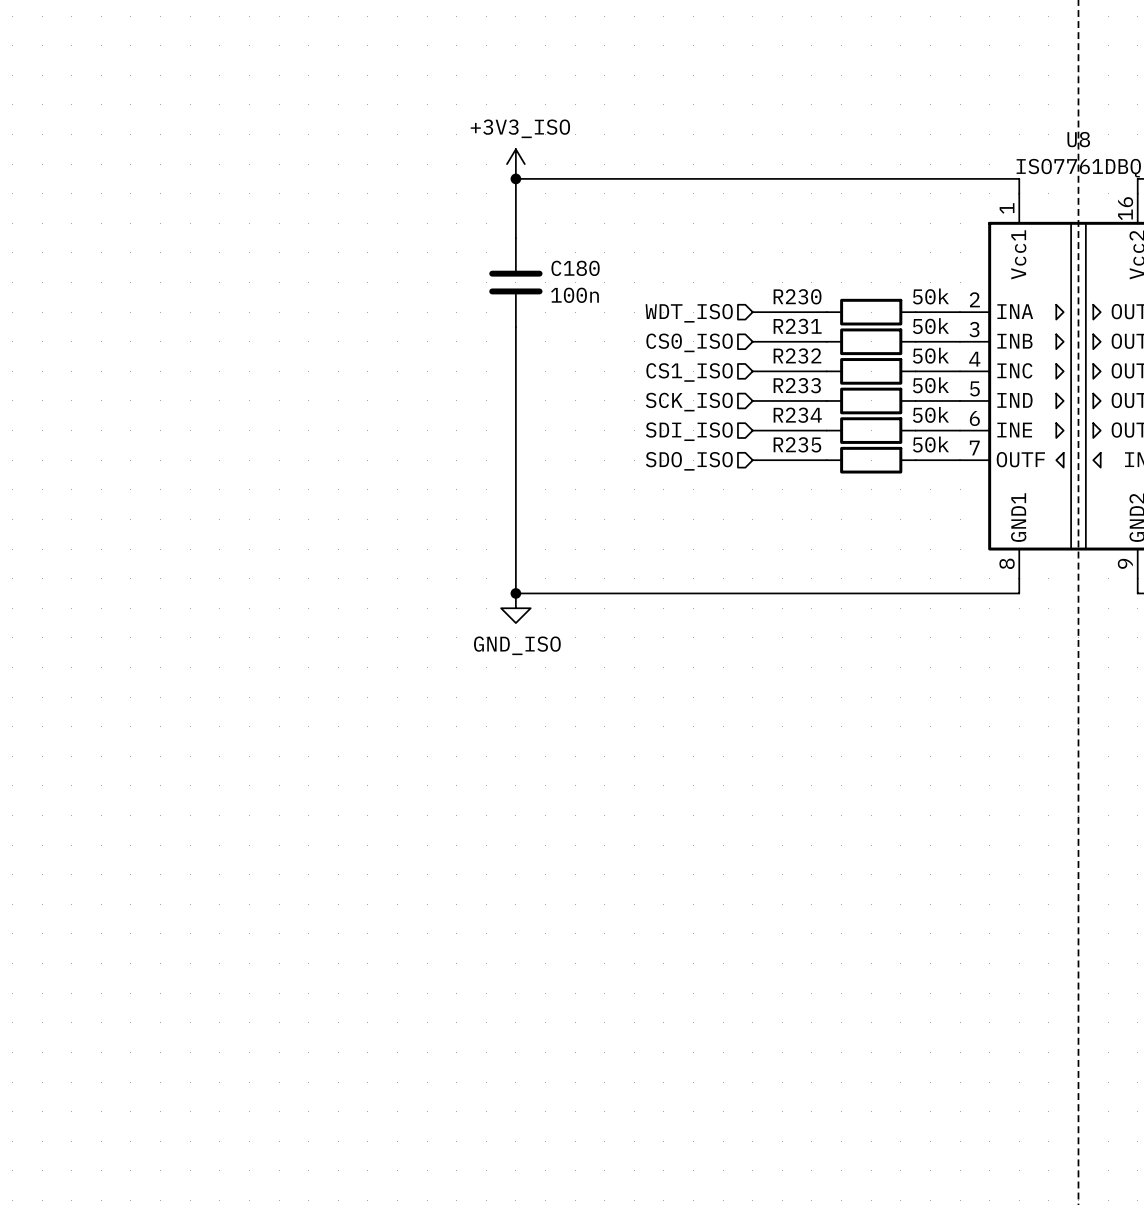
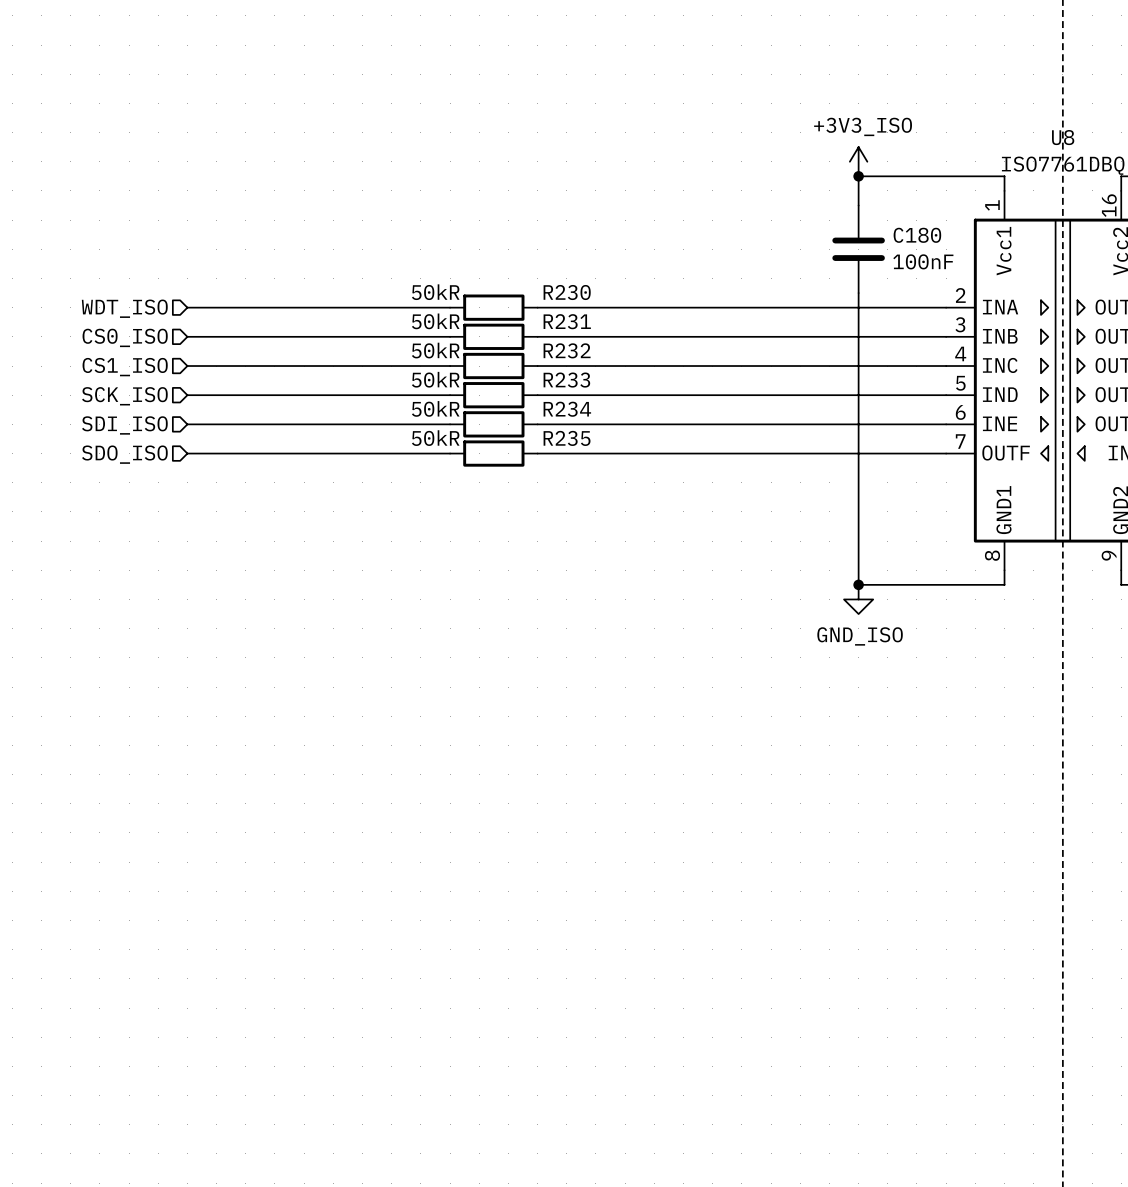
power symbol: +3V3_ISO (515, 164) -> none
power symbol: none -> +3V3_ISO (858, 161)
junction: (515, 178) -> none
wire: (871, 178) (515, 178) (515, 238) -> (858, 176) (858, 205)
junction: none -> (858, 176)
C180 position: (515, 282) -> (858, 249)
C180 value: 100n (574, 295) -> 100nF (923, 261)
R230 name position: R230 (797, 296) -> R230 (567, 292)
R230 value: 50k (930, 296) -> 50kR (435, 292)
wire: none -> (187, 307) (450, 307)
wire: none -> (537, 307) (741, 307)
wire: none -> (814, 307) (902, 307)
R230 position: (871, 312) -> (493, 307)
hierarchical label: none -> WDT_ISO (124, 308)
hierarchical label: WDT_ISO (689, 313) -> none
wire: (515, 326) (515, 593) (871, 593) -> (858, 293) (858, 584)
R231 name position: R231 (797, 326) -> R231 (567, 321)
R231 value: 50k (930, 326) -> 50kR (435, 321)
wire: none -> (187, 336) (450, 336)
wire: none -> (537, 336) (741, 336)
wire: none -> (814, 336) (902, 336)
R231 position: (871, 341) -> (493, 336)
hierarchical label: none -> CS0_ISO (125, 337)
hierarchical label: CS0_ISO (689, 342) -> none
R232 value: 50k (930, 355) -> 50kR (435, 350)
R232 name position: R232 (797, 356) -> R232 (567, 350)
wire: none -> (187, 366) (450, 366)
wire: none -> (537, 366) (741, 366)
wire: none -> (814, 366) (902, 366)
R232 position: (871, 371) -> (493, 366)
hierarchical label: none -> CS1_ISO (125, 367)
hierarchical label: CS1_ISO (689, 372) -> none
R233 name position: R233 (797, 385) -> R233 (566, 380)
R233 value: 50k (930, 385) -> 50kR (435, 379)
wire: none -> (187, 395) (450, 395)
wire: none -> (537, 395) (741, 395)
wire: none -> (814, 395) (902, 395)
R233 position: (871, 400) -> (493, 395)
hierarchical label: none -> SCK_ISO (124, 396)
hierarchical label: SCK_ISO (689, 402) -> none
R234 value: 50k (930, 414) -> 50kR (435, 408)
R234 name position: R234 (797, 415) -> R234 (567, 409)
wire: none -> (187, 424) (450, 424)
wire: none -> (537, 424) (741, 424)
wire: none -> (814, 424) (902, 424)
R234 position: (871, 430) -> (493, 424)
hierarchical label: none -> SDI_ISO (124, 425)
hierarchical label: SDI_ISO (689, 431) -> none
R235 name position: R235 (797, 444) -> R235 (567, 438)
R235 value: 50k (930, 444) -> 50kR (435, 438)
wire: none -> (187, 453) (450, 453)
wire: none -> (537, 453) (741, 453)
wire: none -> (814, 453) (902, 453)
R235 position: (871, 460) -> (493, 453)
hierarchical label: none -> SDO_ISO (124, 454)
hierarchical label: SDO_ISO (689, 461) -> none
junction: (515, 593) -> none
junction: none -> (858, 584)
power symbol: GND_ISO (515, 608) -> none
power symbol: none -> GND_ISO (858, 599)

